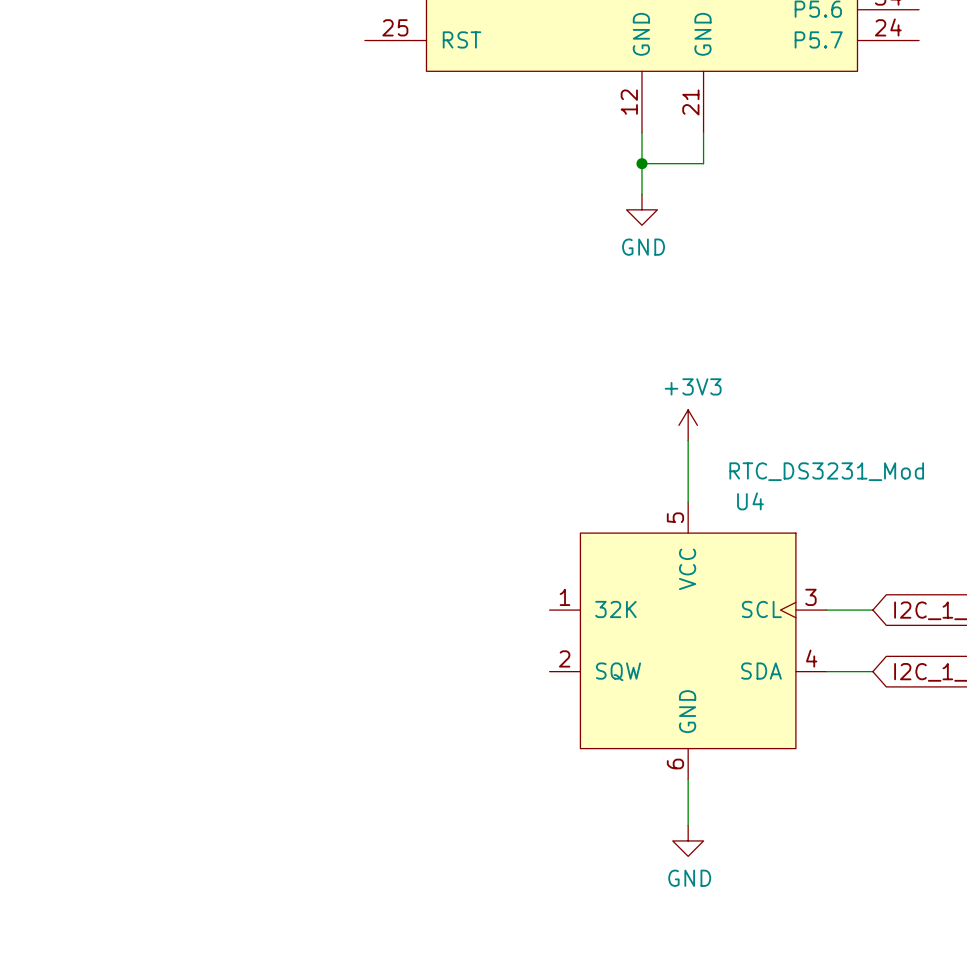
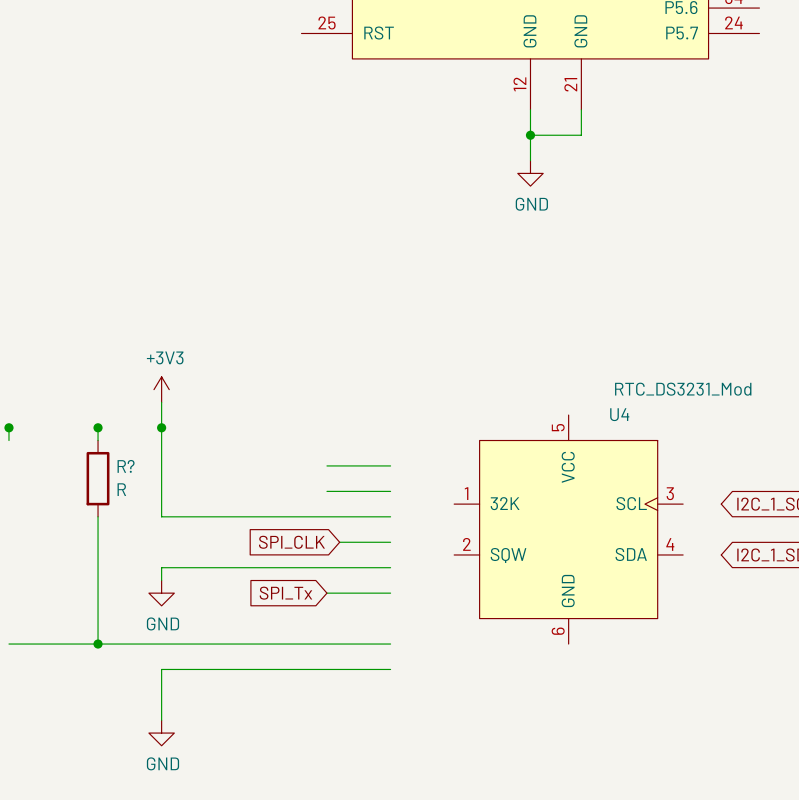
power symbol: +3V3 (688, 425) -> none
wire: (688, 440) (688, 502) -> none
power symbol: none -> +3V3 (161, 389)
wire: none -> (161, 402) (161, 516) (390, 516)
wire: none -> (8, 427) (8, 440)
junction: none -> (8, 427)
wire: none -> (98, 427) (98, 440)
junction: none -> (98, 427)
junction: none -> (161, 427)
wire: none -> (326, 465) (390, 465)
R?: none -> R (98, 478)
wire: none -> (326, 491) (390, 491)
wire: (826, 610) (872, 610) -> none
wire: none -> (98, 516) (98, 644)
global label: none -> SPI_CLK (291, 542)
wire: none -> (339, 542) (390, 542)
wire: (826, 671) (872, 671) -> none
wire: none -> (390, 567) (161, 567) (161, 580)
power symbol: none -> GND (161, 593)
wire: none -> (326, 593) (390, 593)
global label: none -> SPI_Tx (285, 593)
wire: none -> (8, 644) (390, 644)
junction: none -> (98, 644)
wire: (688, 779) (688, 825) -> none
wire: none -> (390, 669) (161, 669) (161, 720)
power symbol: GND (688, 840) -> none
power symbol: none -> GND (161, 733)

